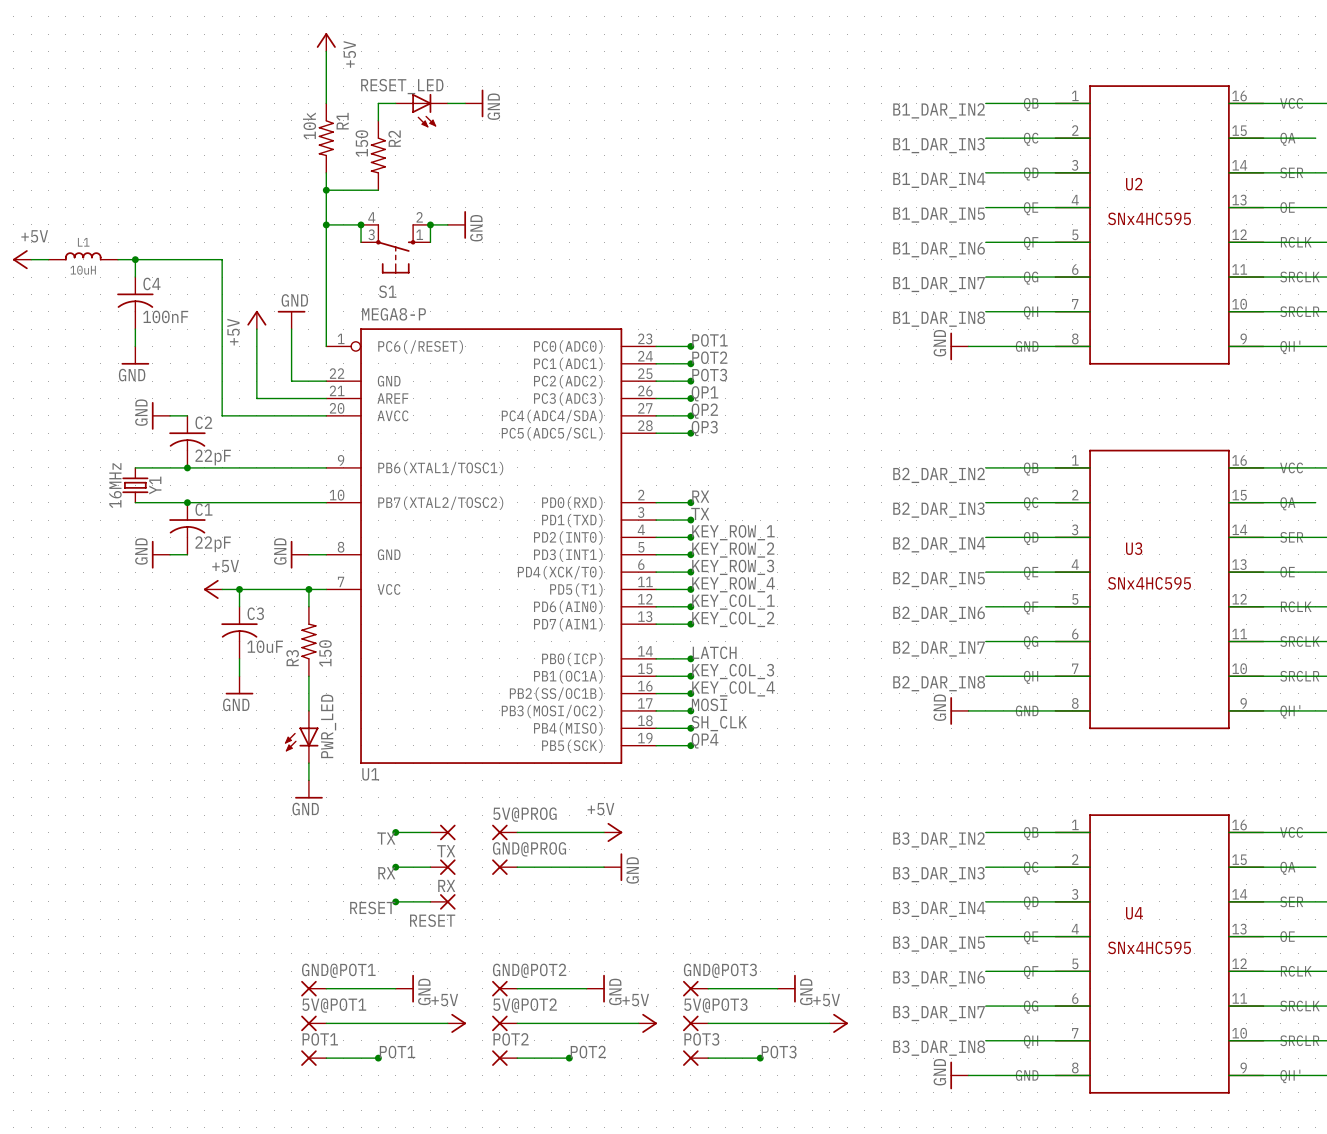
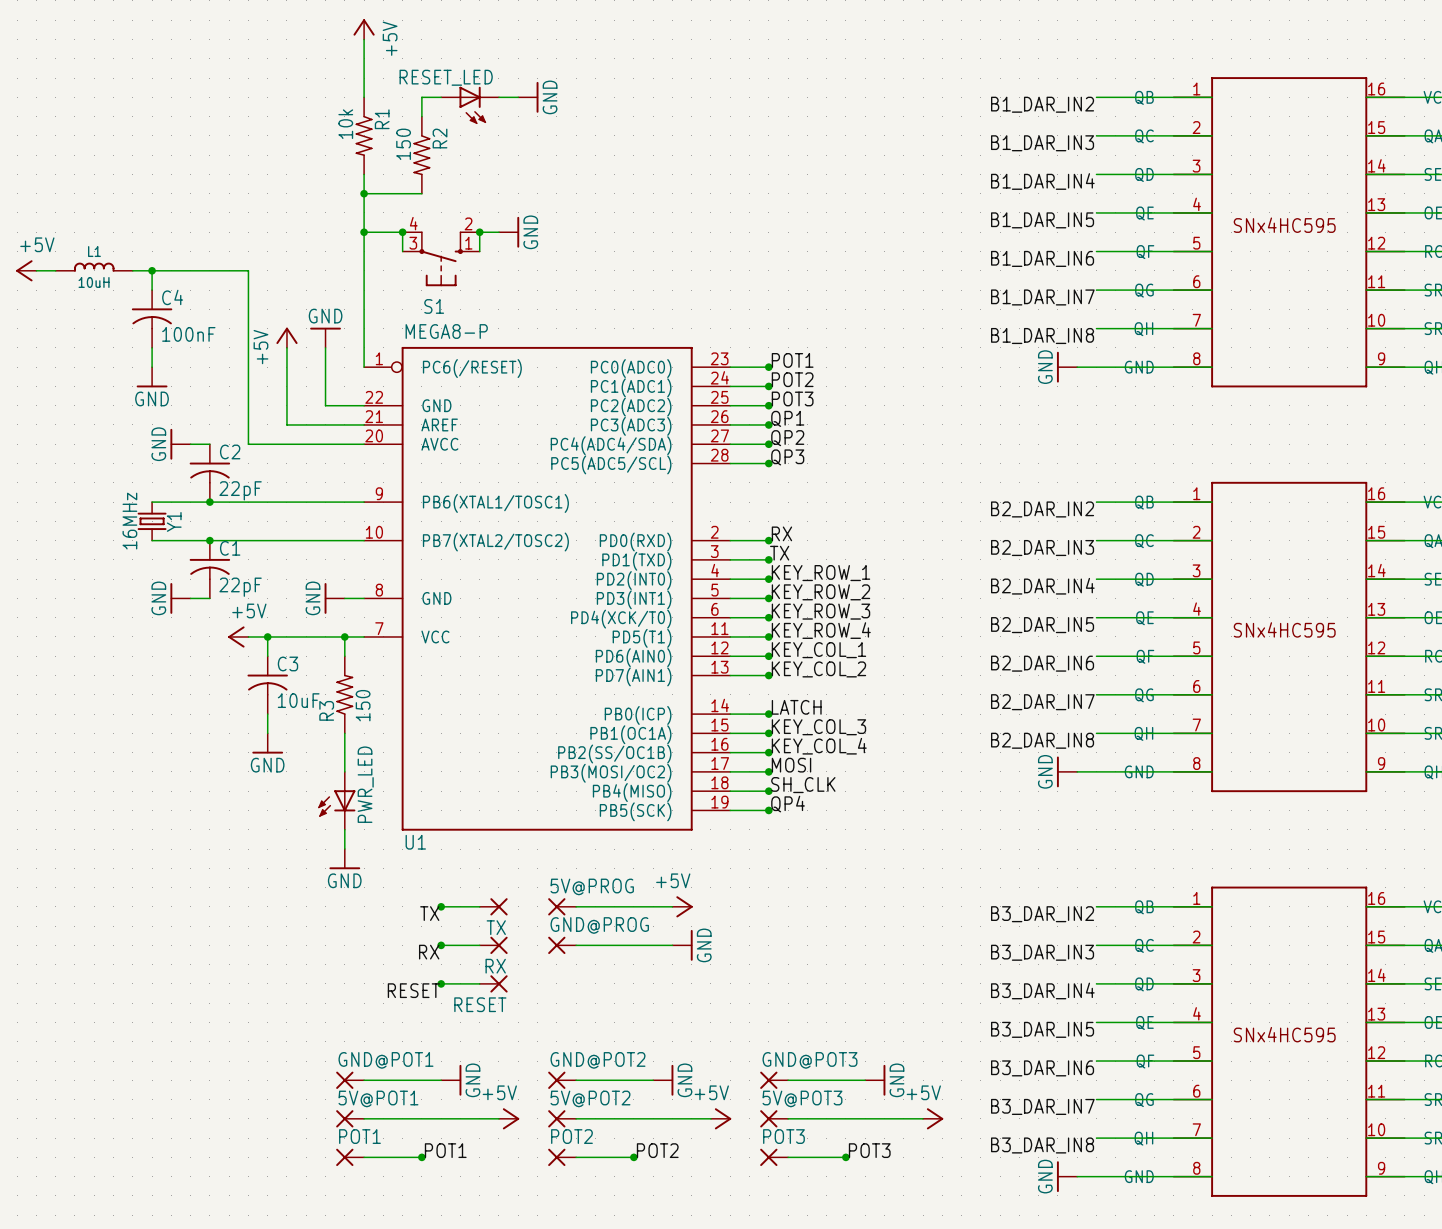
U2 name: U2 (1134, 184) -> none
U3 name: U3 (1134, 548) -> none
U4 name: U4 (1134, 913) -> none

